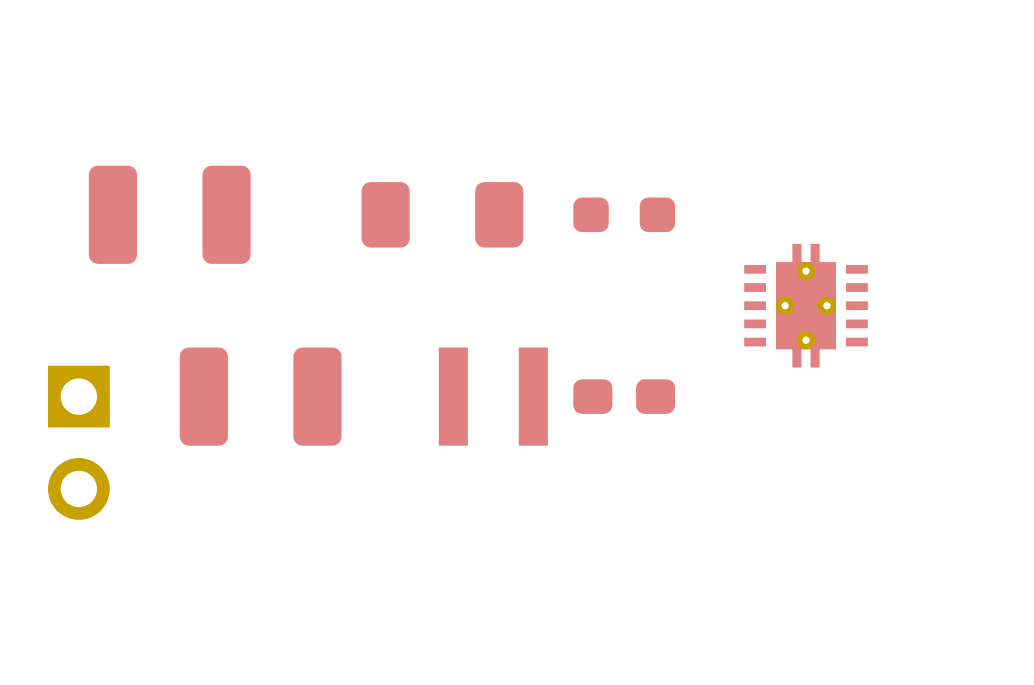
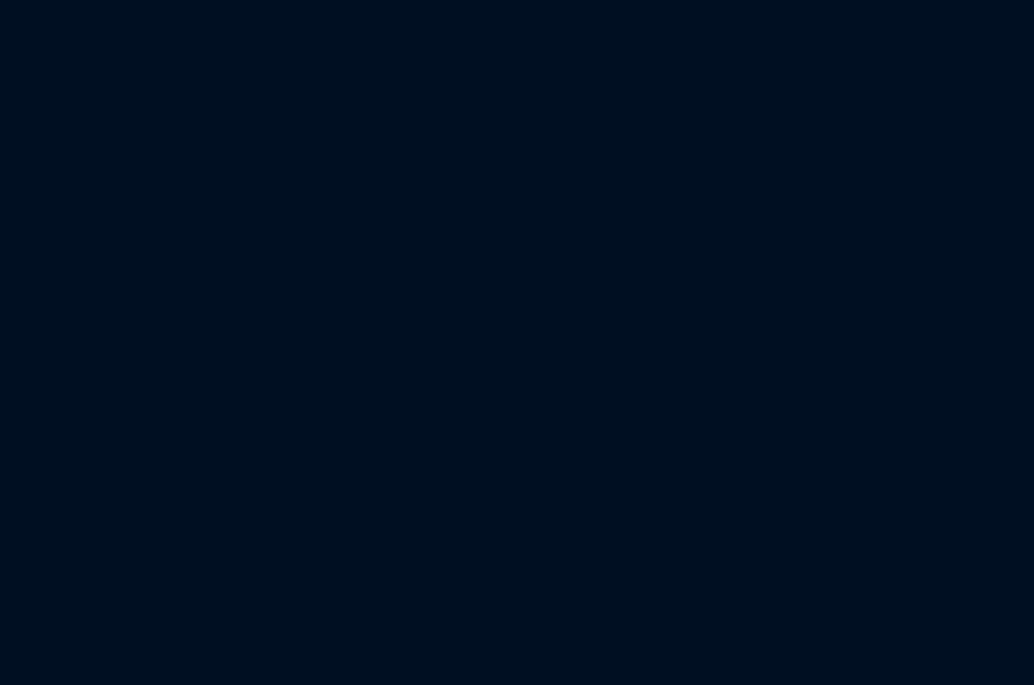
part: (169, 214) -> none
part: (442, 214) -> none
part: (624, 214) -> none
part: (806, 305) -> none
part: (260, 396) -> none
part: (493, 396) -> none
part: (624, 396) -> none
part: (78, 442) -> none

